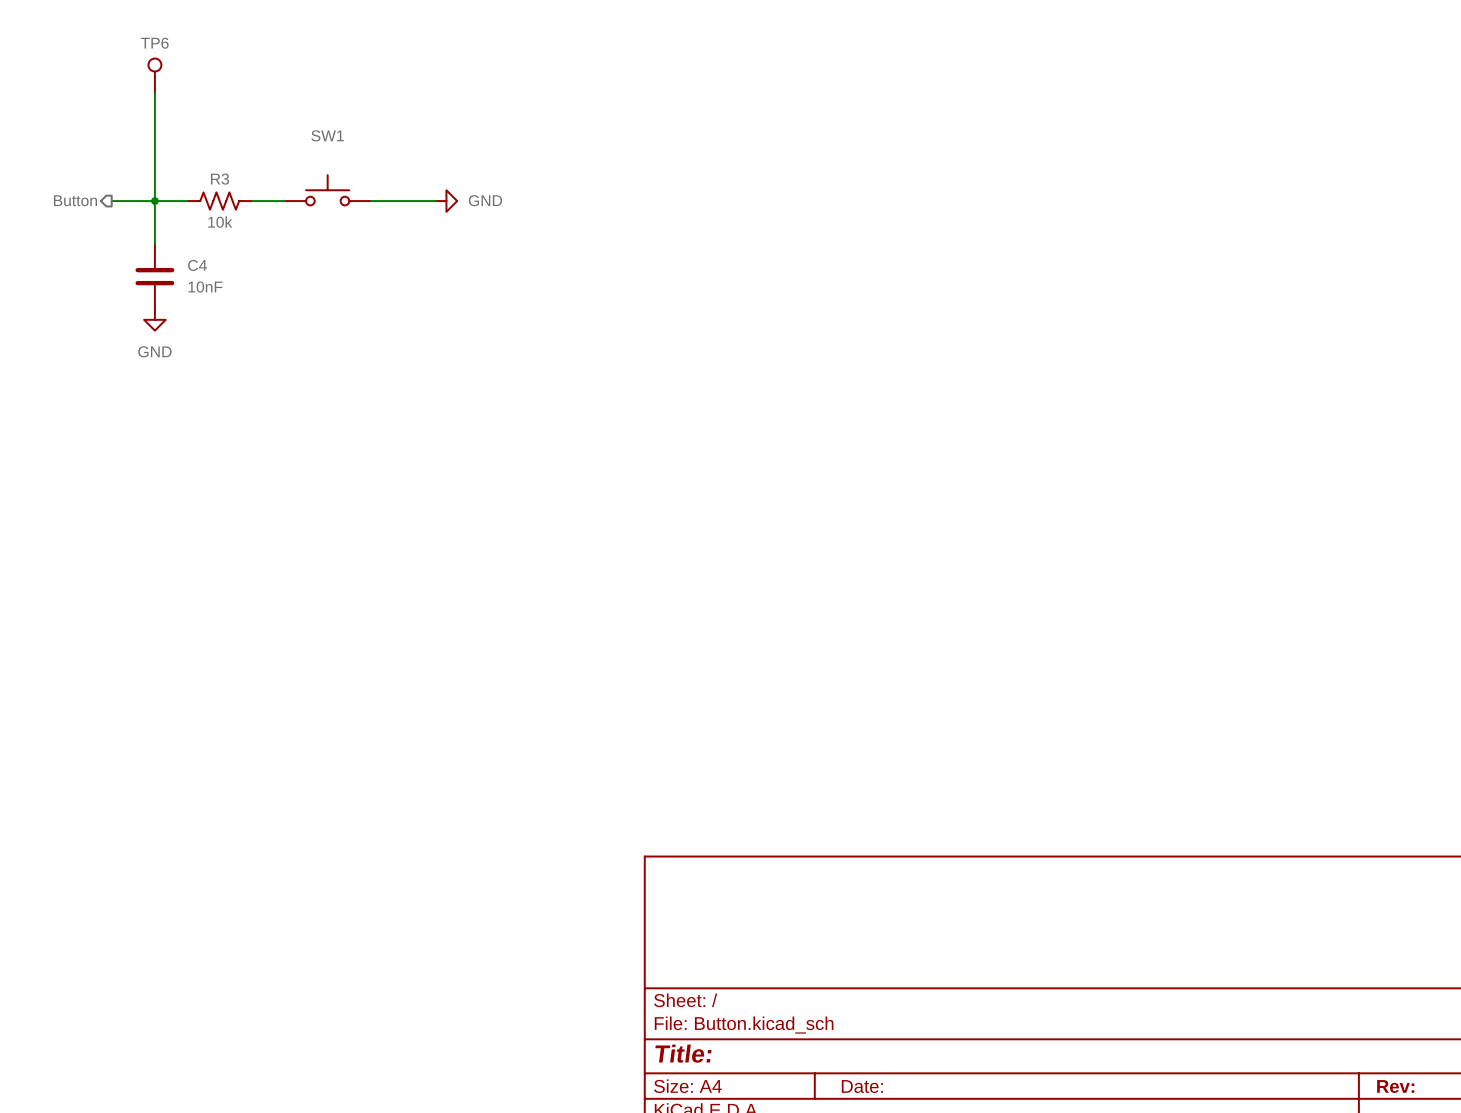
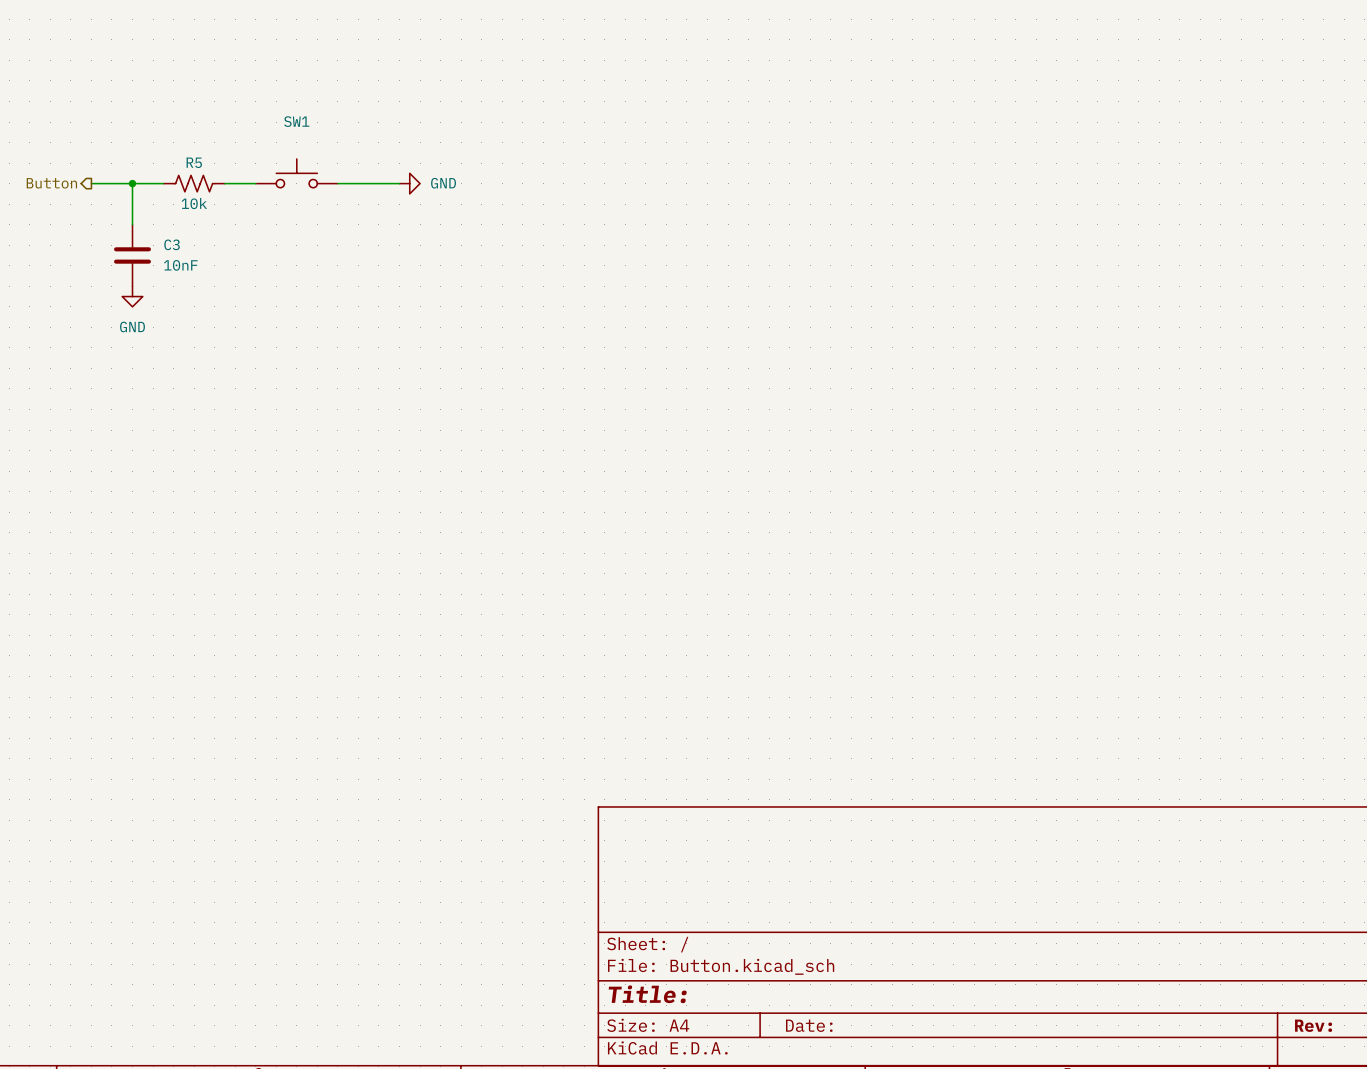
TP6: (154, 75) -> none
wire: (154, 93) (154, 201) -> none
R3 name: R3 (220, 179) -> R5 (194, 162)
C4 name: C4 (197, 265) -> C3 (172, 244)

